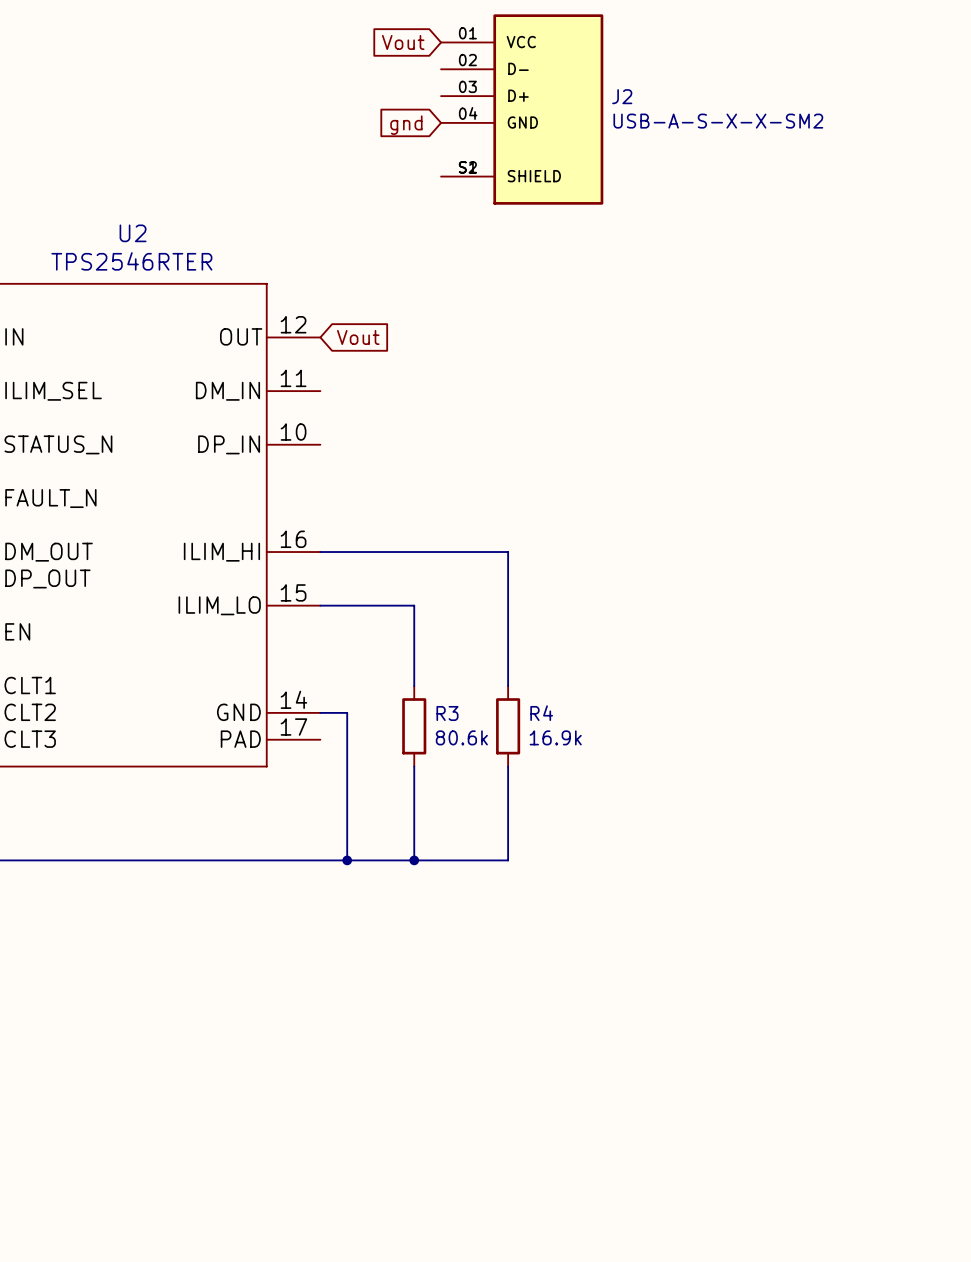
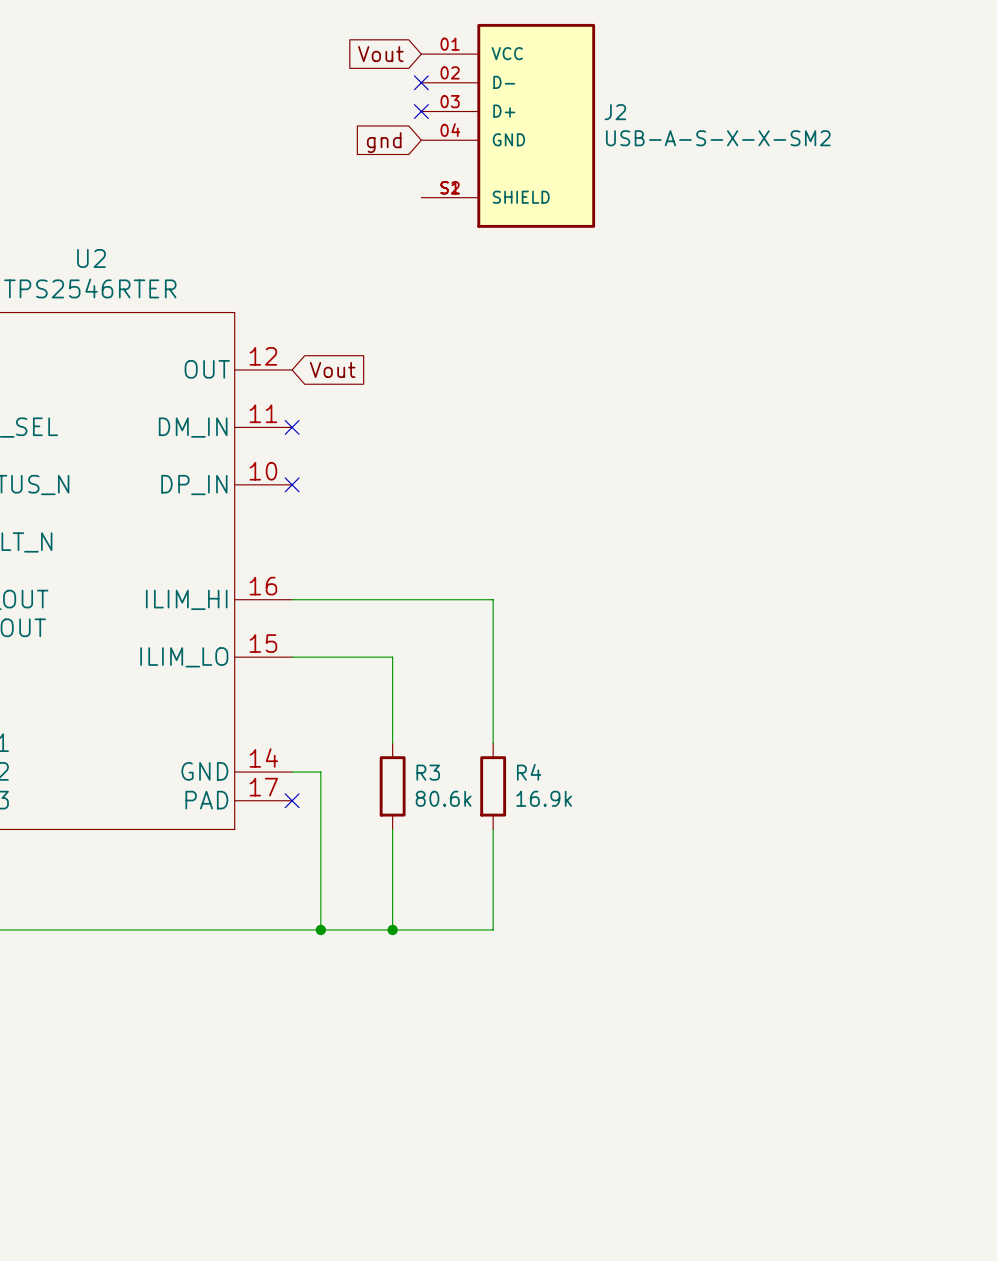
no-connect mark: none -> (421, 82)
no-connect mark: none -> (421, 111)
no-connect mark: none -> (292, 427)
no-connect mark: none -> (292, 484)
no-connect mark: none -> (292, 800)

